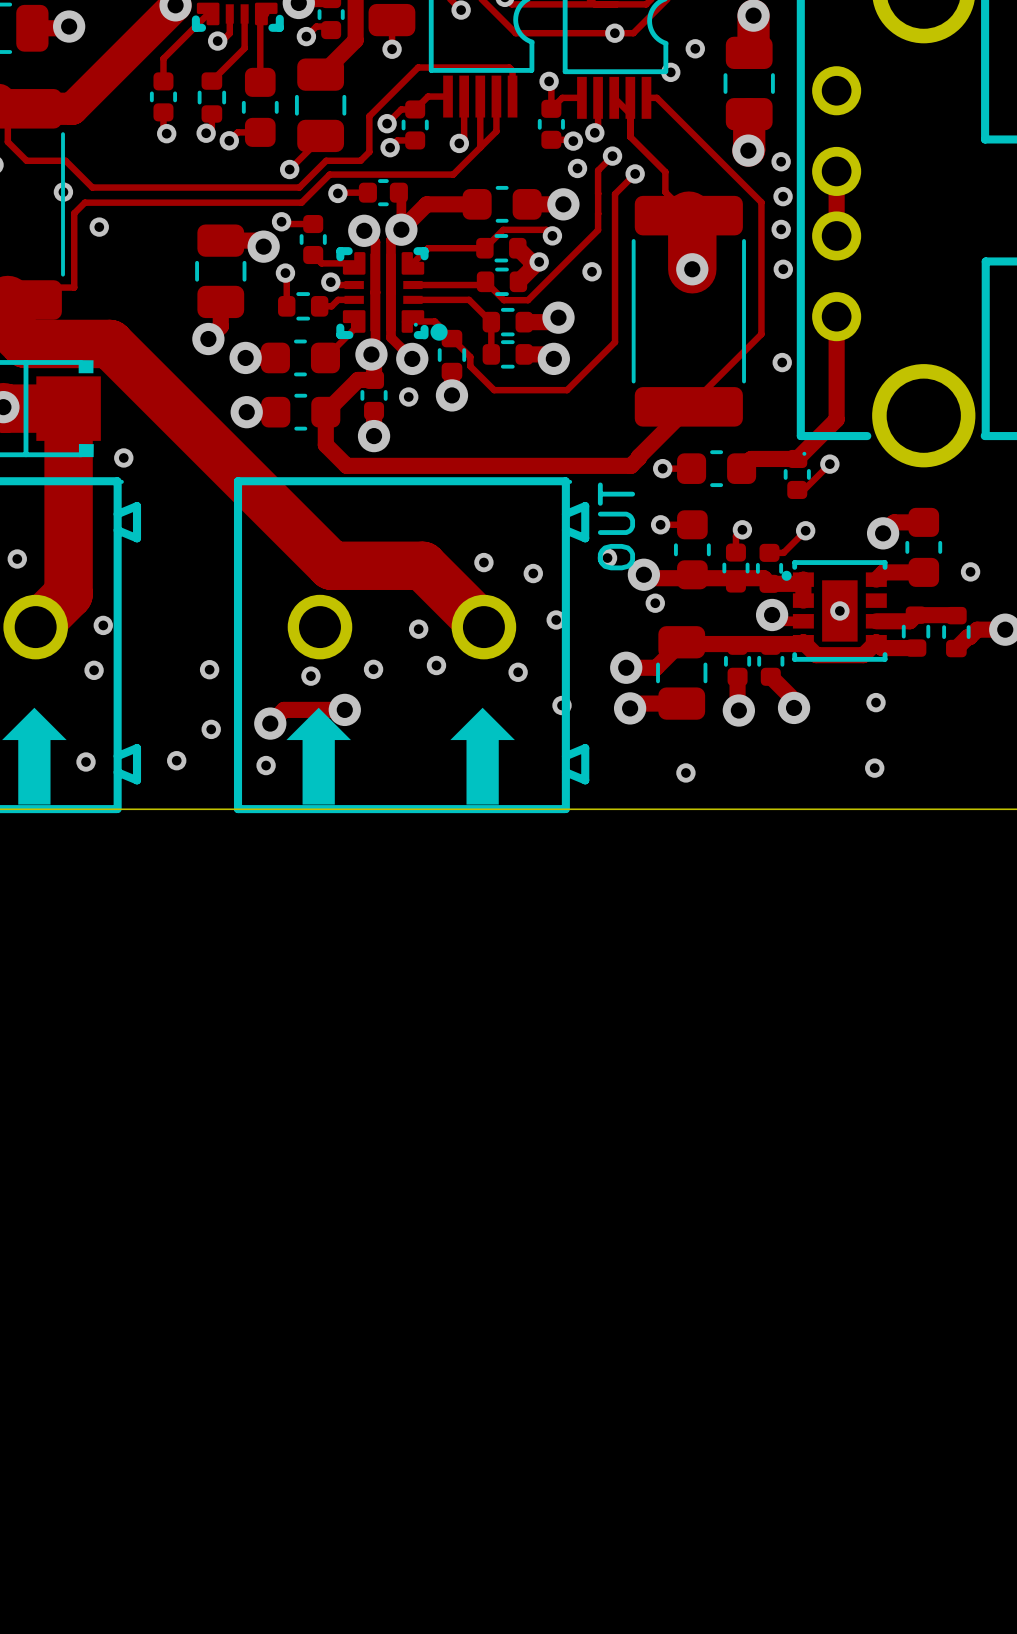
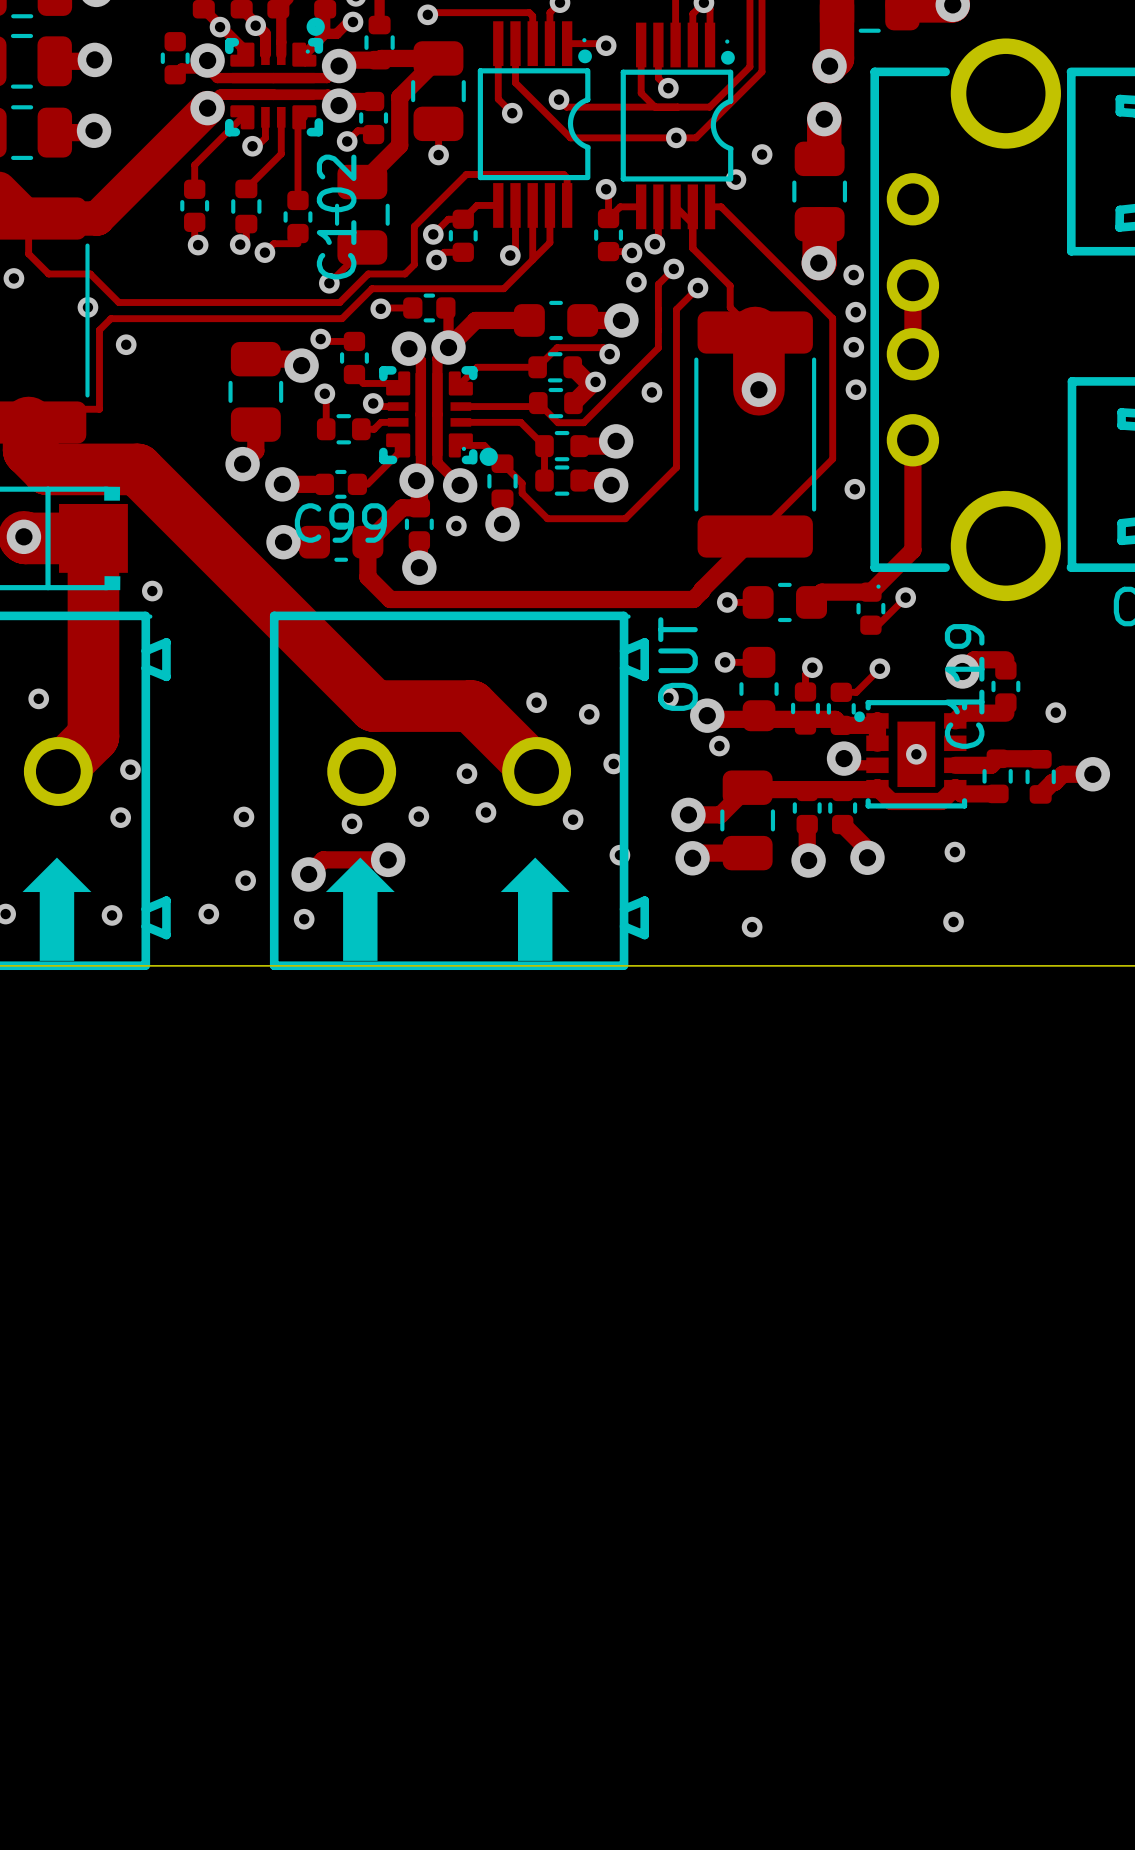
part: (260, 107) -> none
C102: none -> (297, 216)
part: (300, 357) -> none
C99: none -> (340, 484)
part: (923, 547) -> none
C119: none -> (1005, 686)

